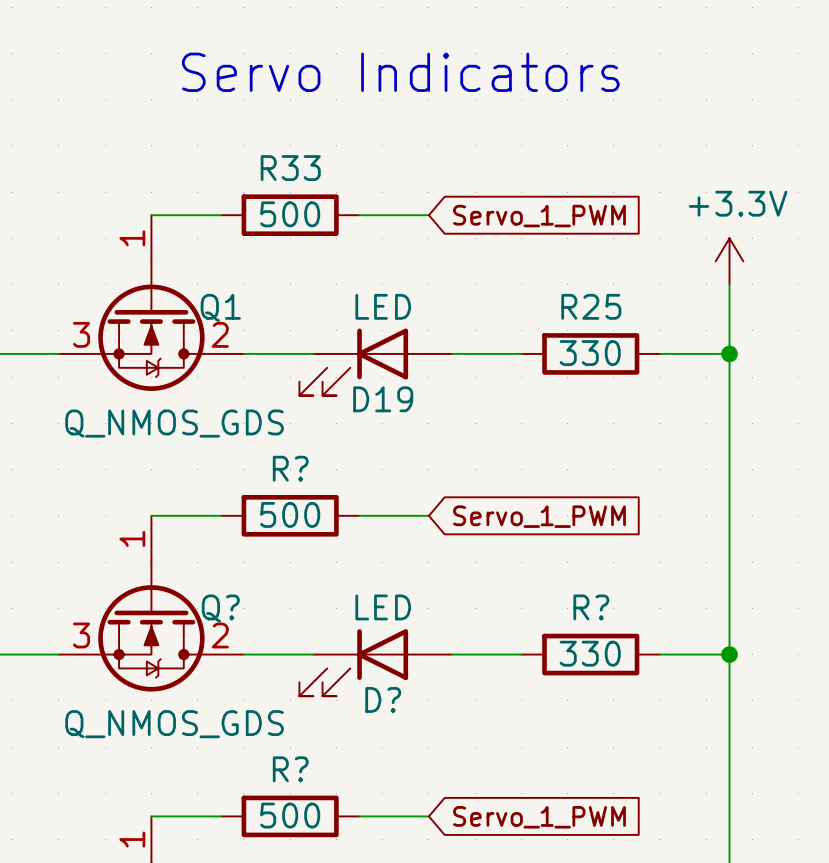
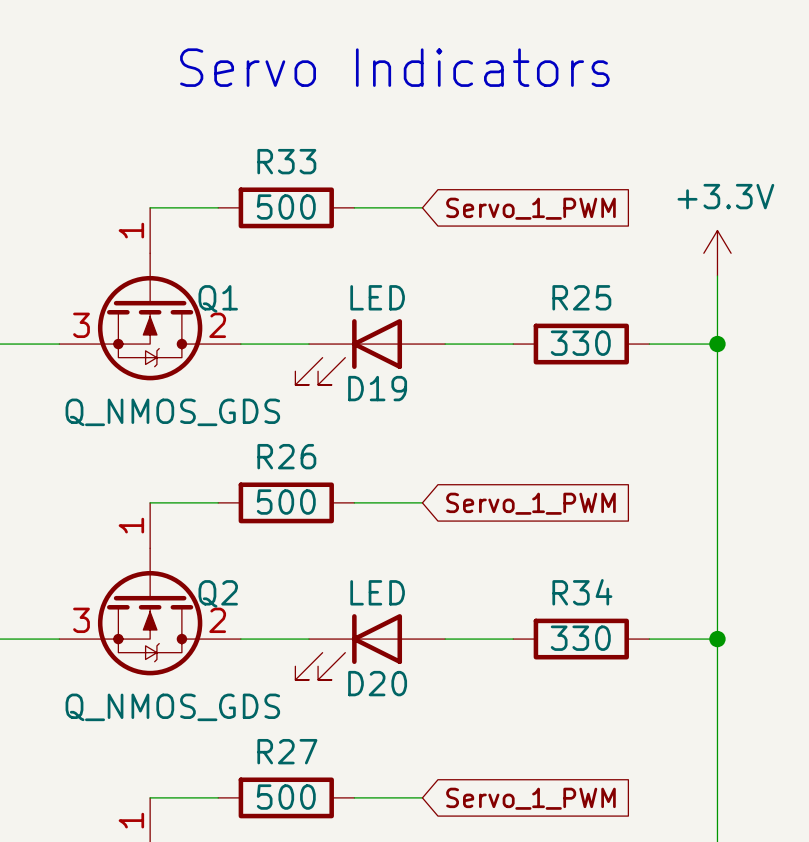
R? name: R? (290, 468) -> R26 (286, 456)
R? name: R? (591, 607) -> R34 (582, 592)
Q? name: Q? (220, 608) -> Q2 (218, 593)
D? name: D? (383, 699) -> D20 (377, 683)
R? name: R? (290, 769) -> R27 (287, 751)

